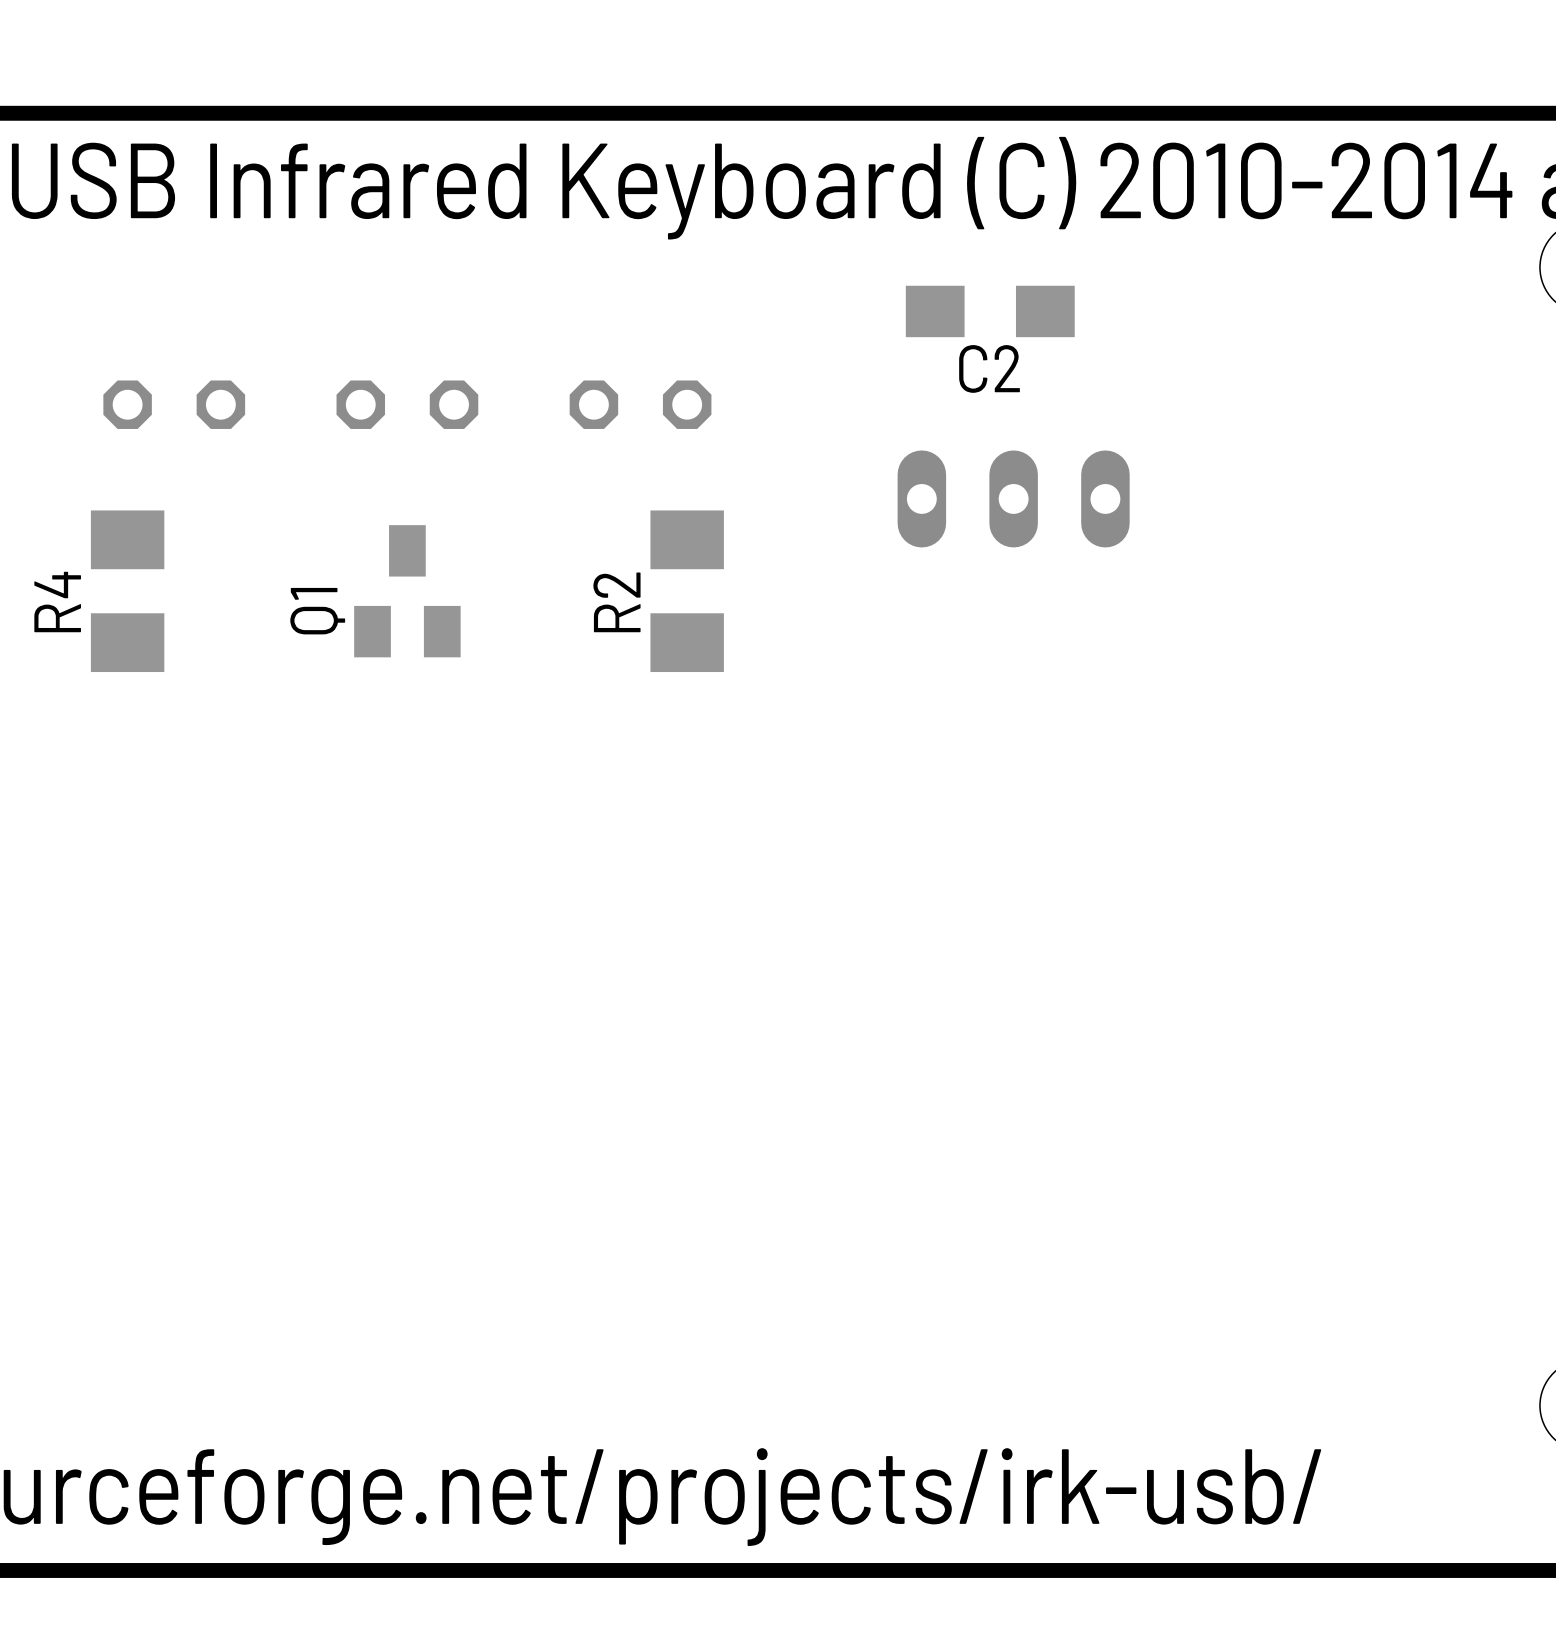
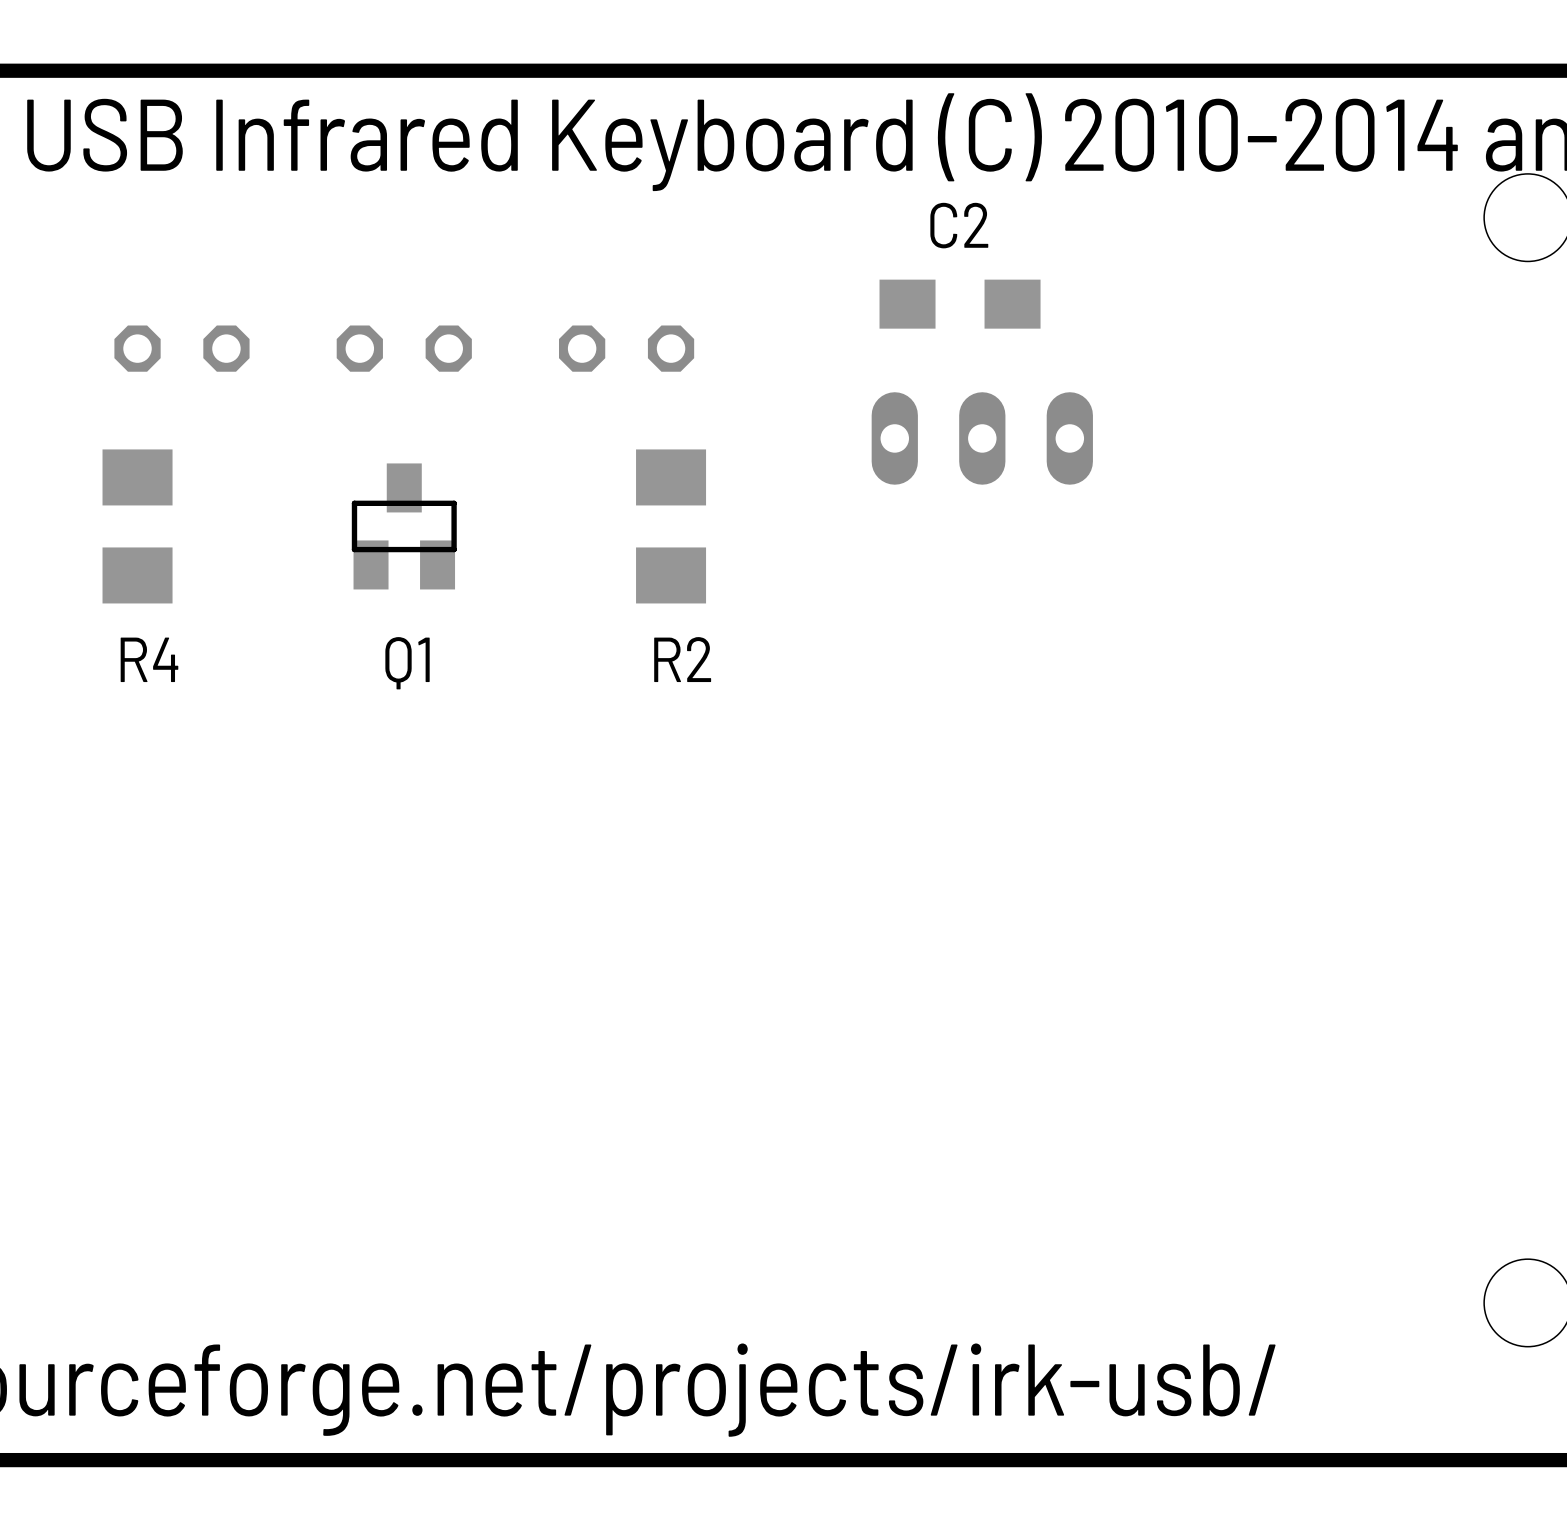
C2 position: (990, 311) -> (960, 304)
C2 name position: C2 (989, 368) -> C2 (959, 225)
Q1 footprint: [354, 525, 461, 658] -> [351, 463, 457, 590]
R4 name rotation: 0° (57, 602) -> 90° clockwise (149, 659)
R4 name position: R4 (57, 602) -> R4 (149, 659)
R2 name rotation: 0° (616, 602) -> 90° clockwise (682, 659)
R2 name position: R2 (616, 602) -> R2 (682, 659)
Q1 name position: Q1 (317, 611) -> Q1 (407, 663)

